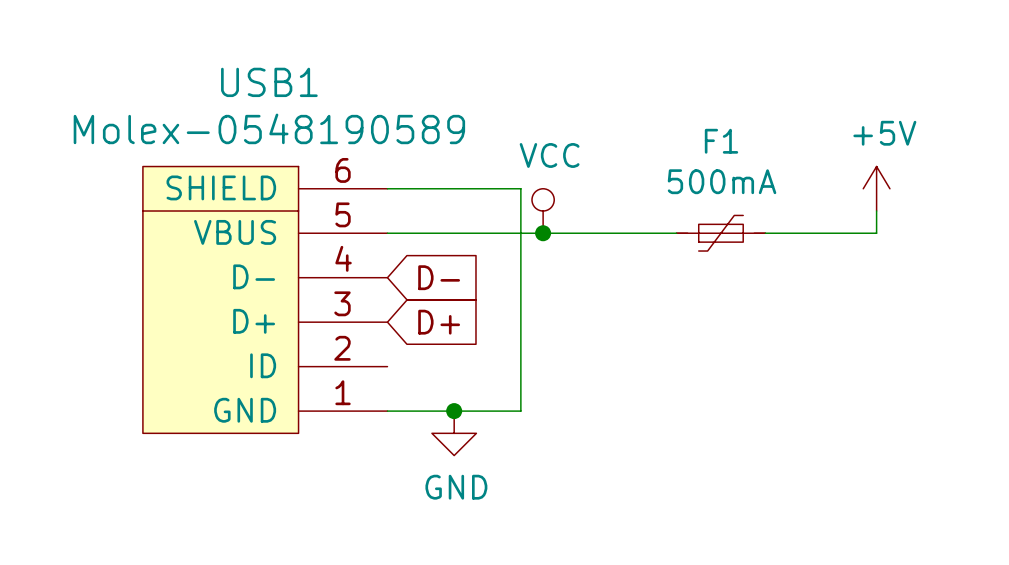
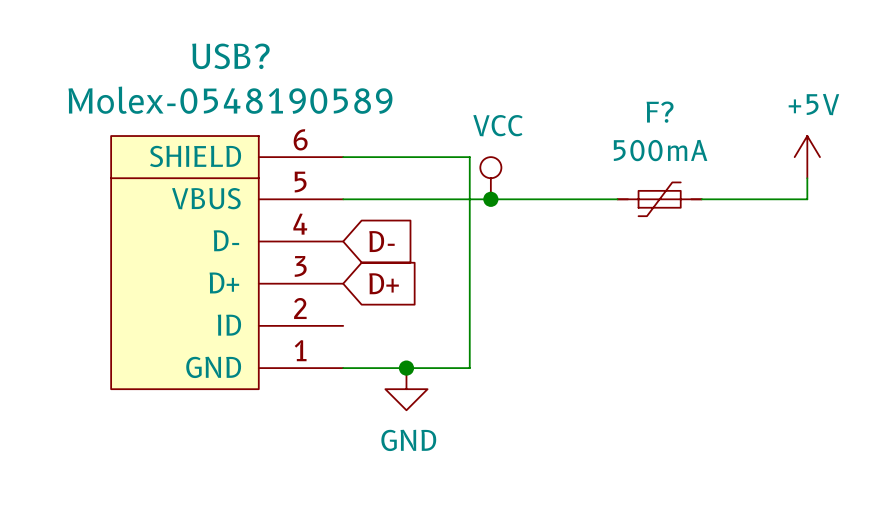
USB1 name: USB1 (269, 82) -> USB? (230, 56)
F1 name: F1 (721, 141) -> F? (660, 112)

